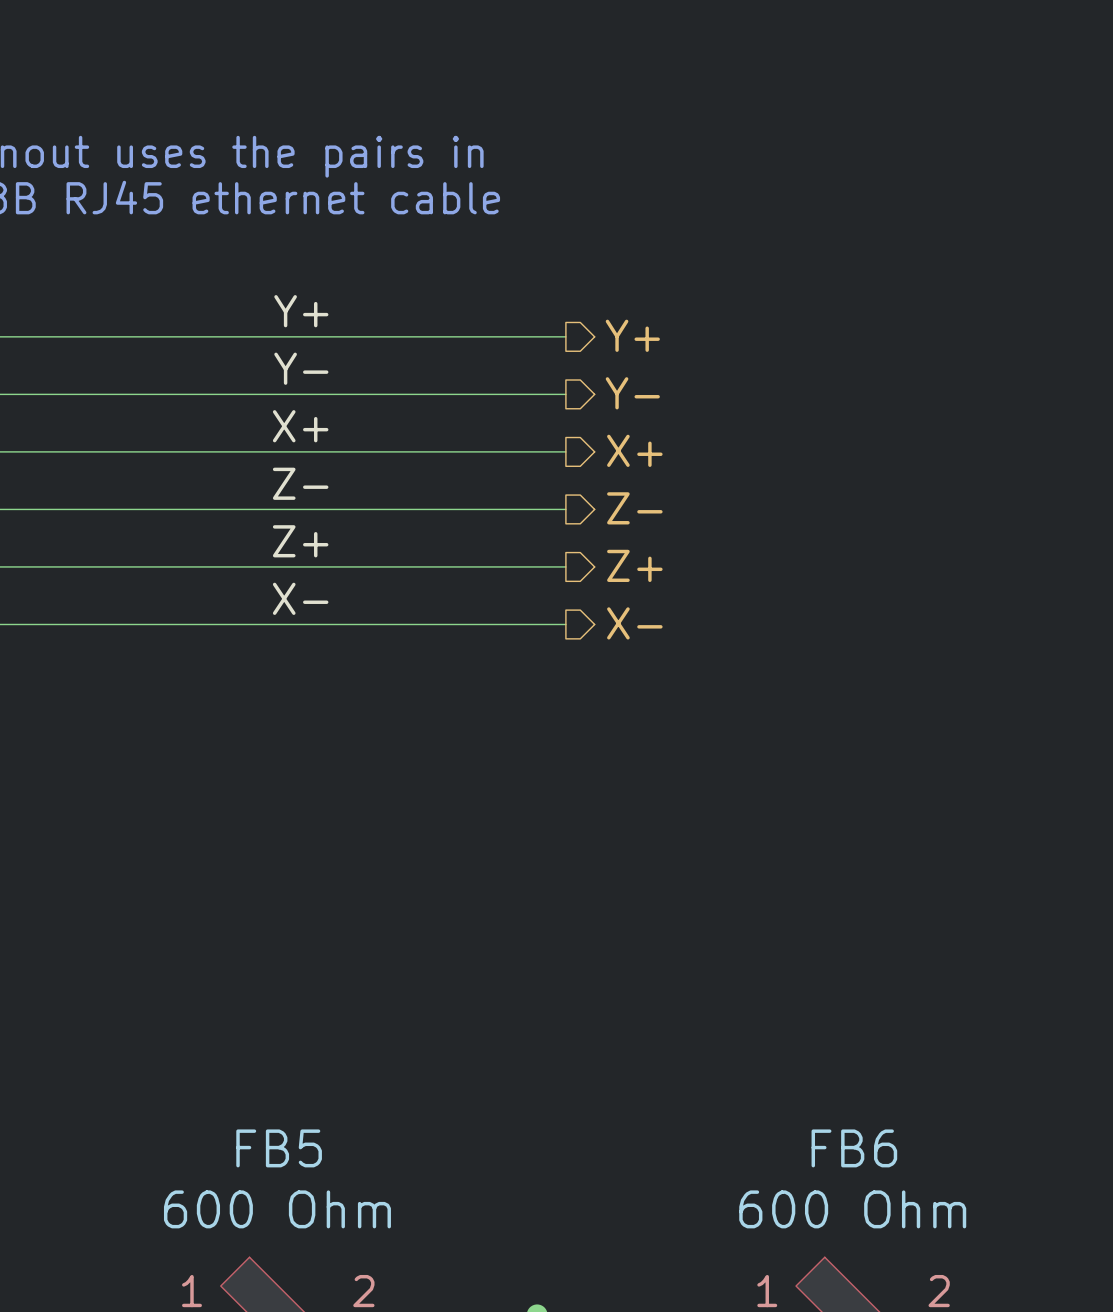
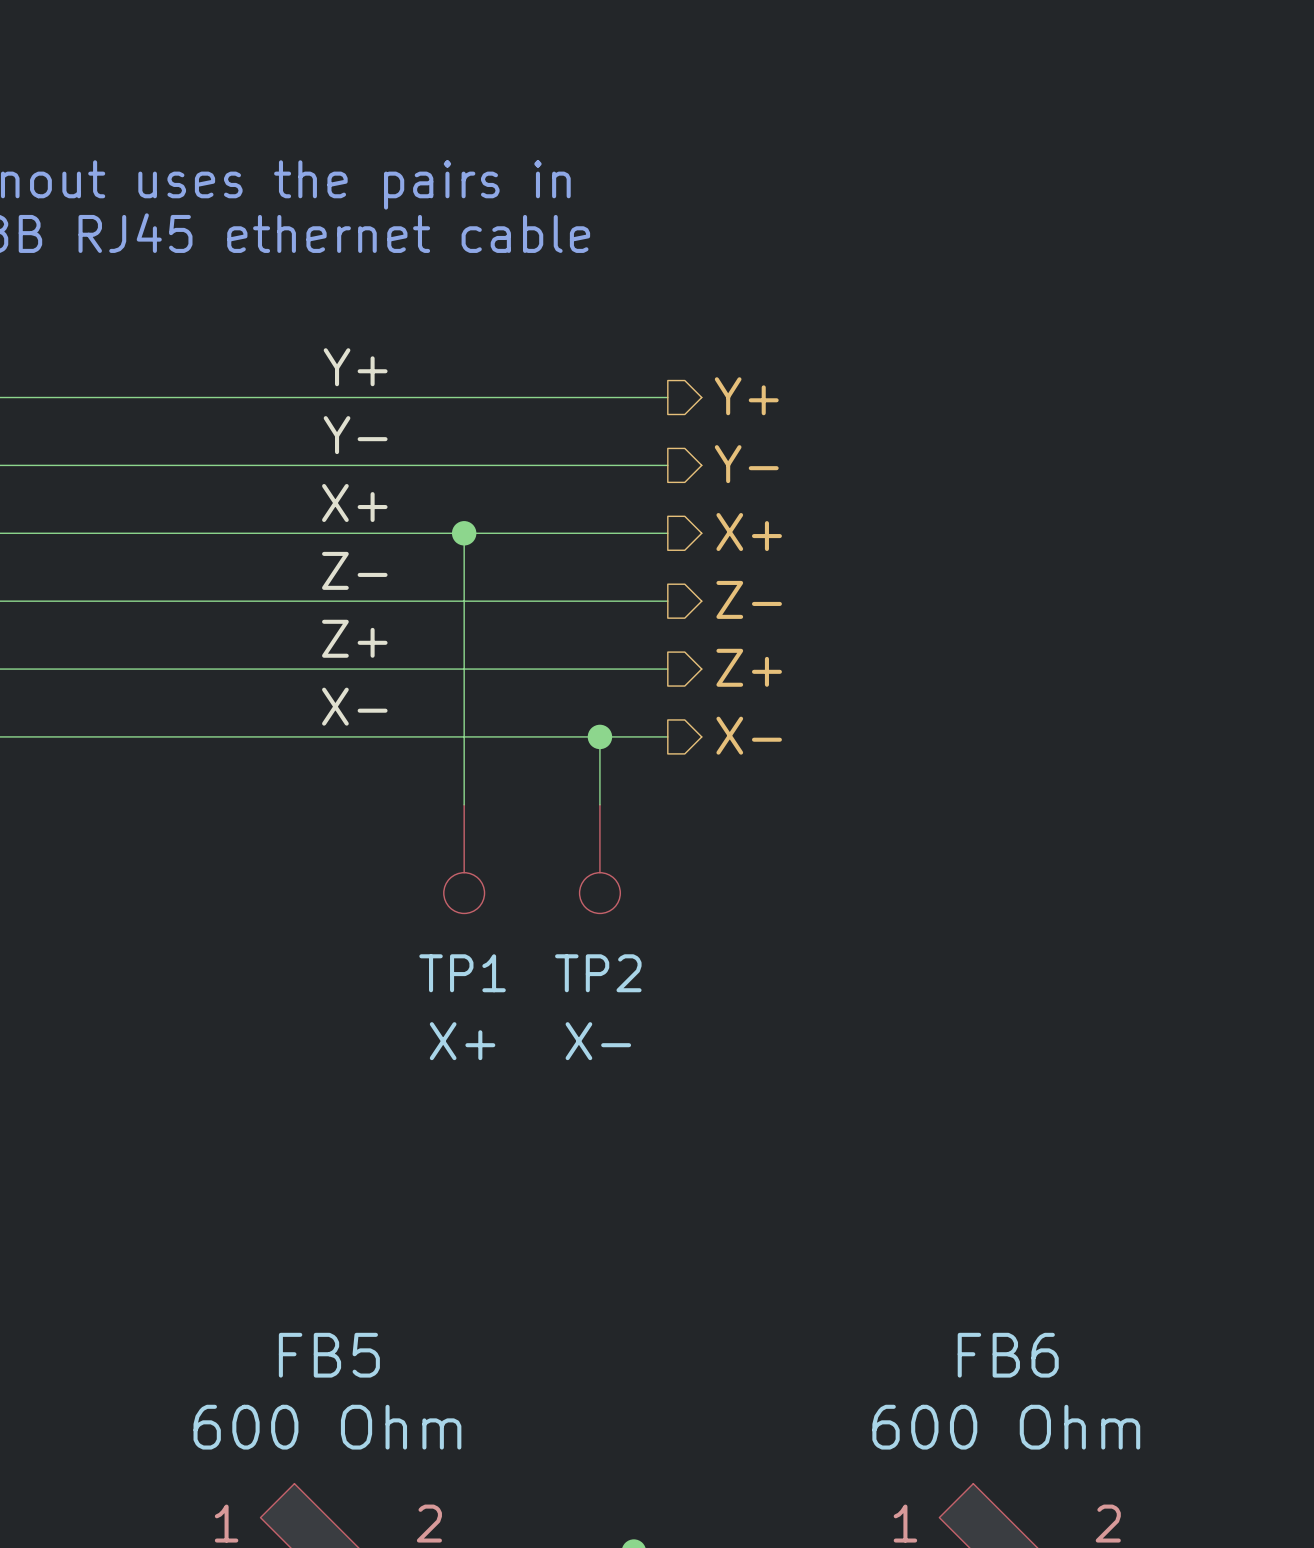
wire: none -> (464, 533) (464, 804)
junction: none -> (464, 533)
wire: none -> (599, 736) (599, 804)
junction: none -> (599, 736)
TP1: none -> X+ (464, 859)
TP2: none -> X- (599, 859)

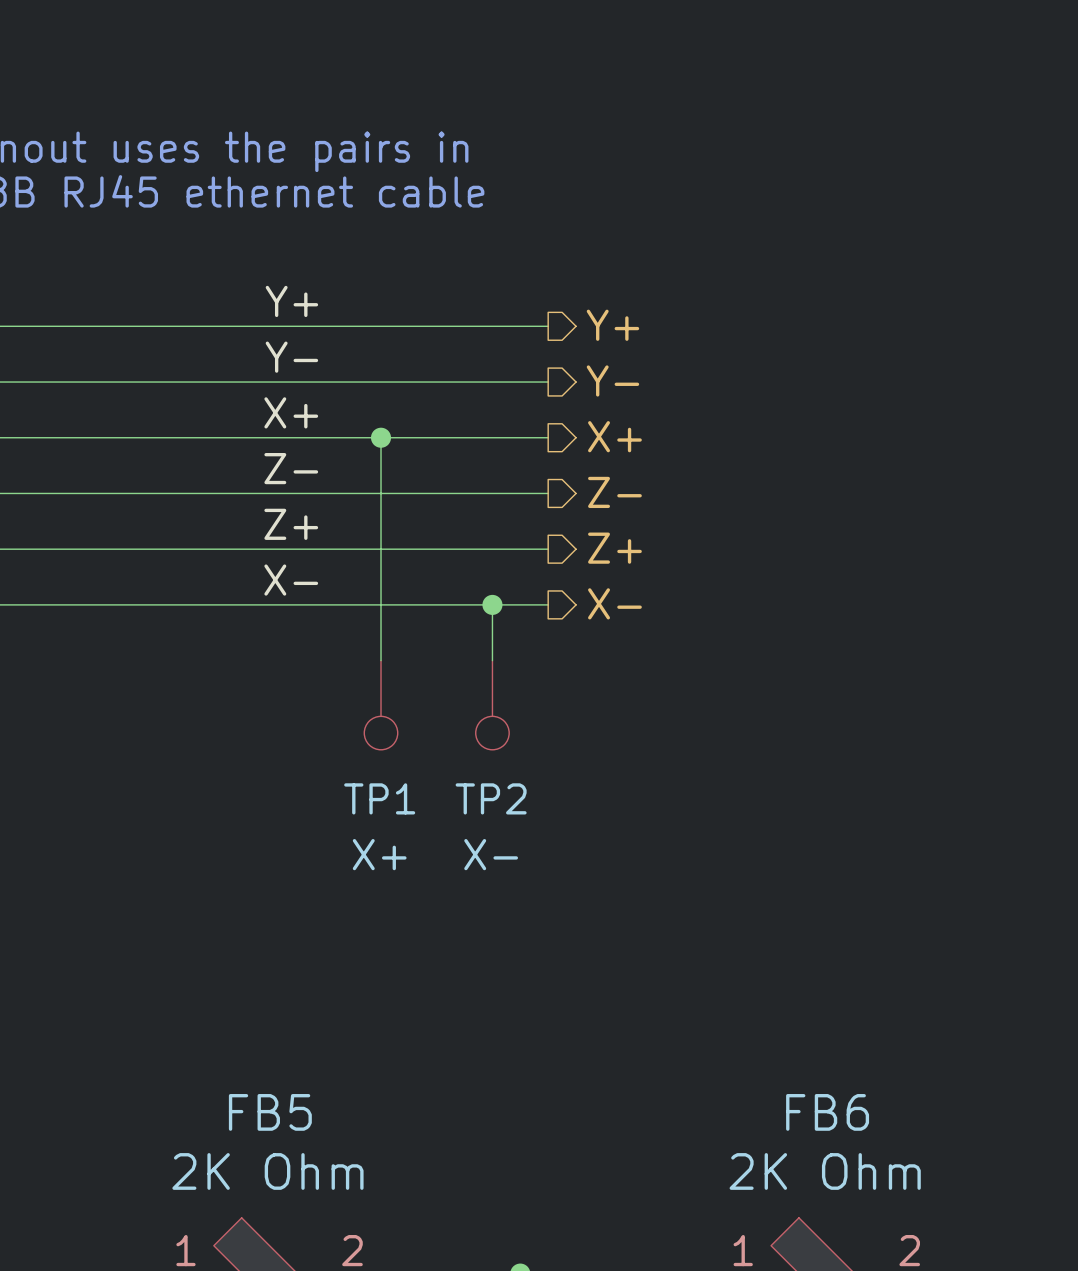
FB5 value: 600 Ohm (327, 1427) -> 2K Ohm (267, 1171)
FB6 value: 600 Ohm (1006, 1427) -> 2K Ohm (825, 1171)

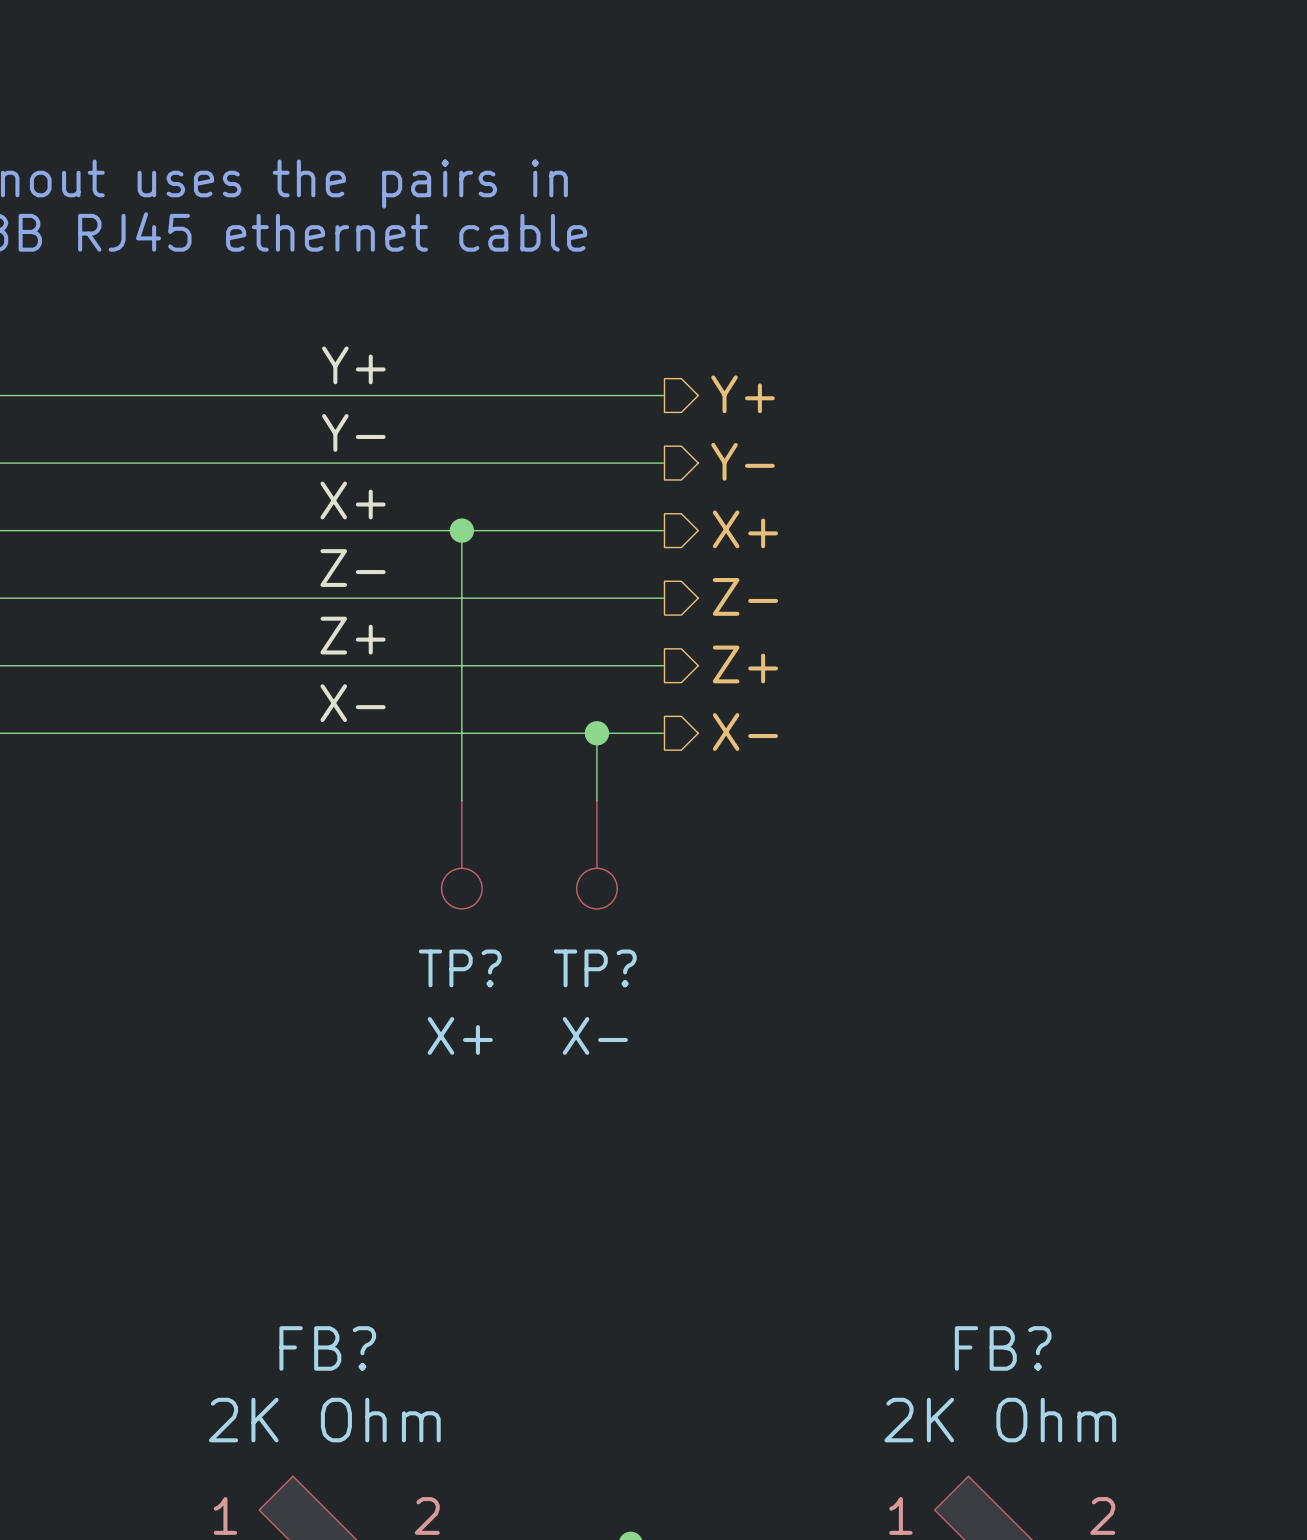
TP1 name: TP1 (379, 798) -> TP? (460, 968)
TP2 name: TP2 (491, 798) -> TP? (595, 968)
FB5 name: FB5 (270, 1112) -> FB? (327, 1348)
FB6 name: FB6 (827, 1112) -> FB? (1003, 1348)

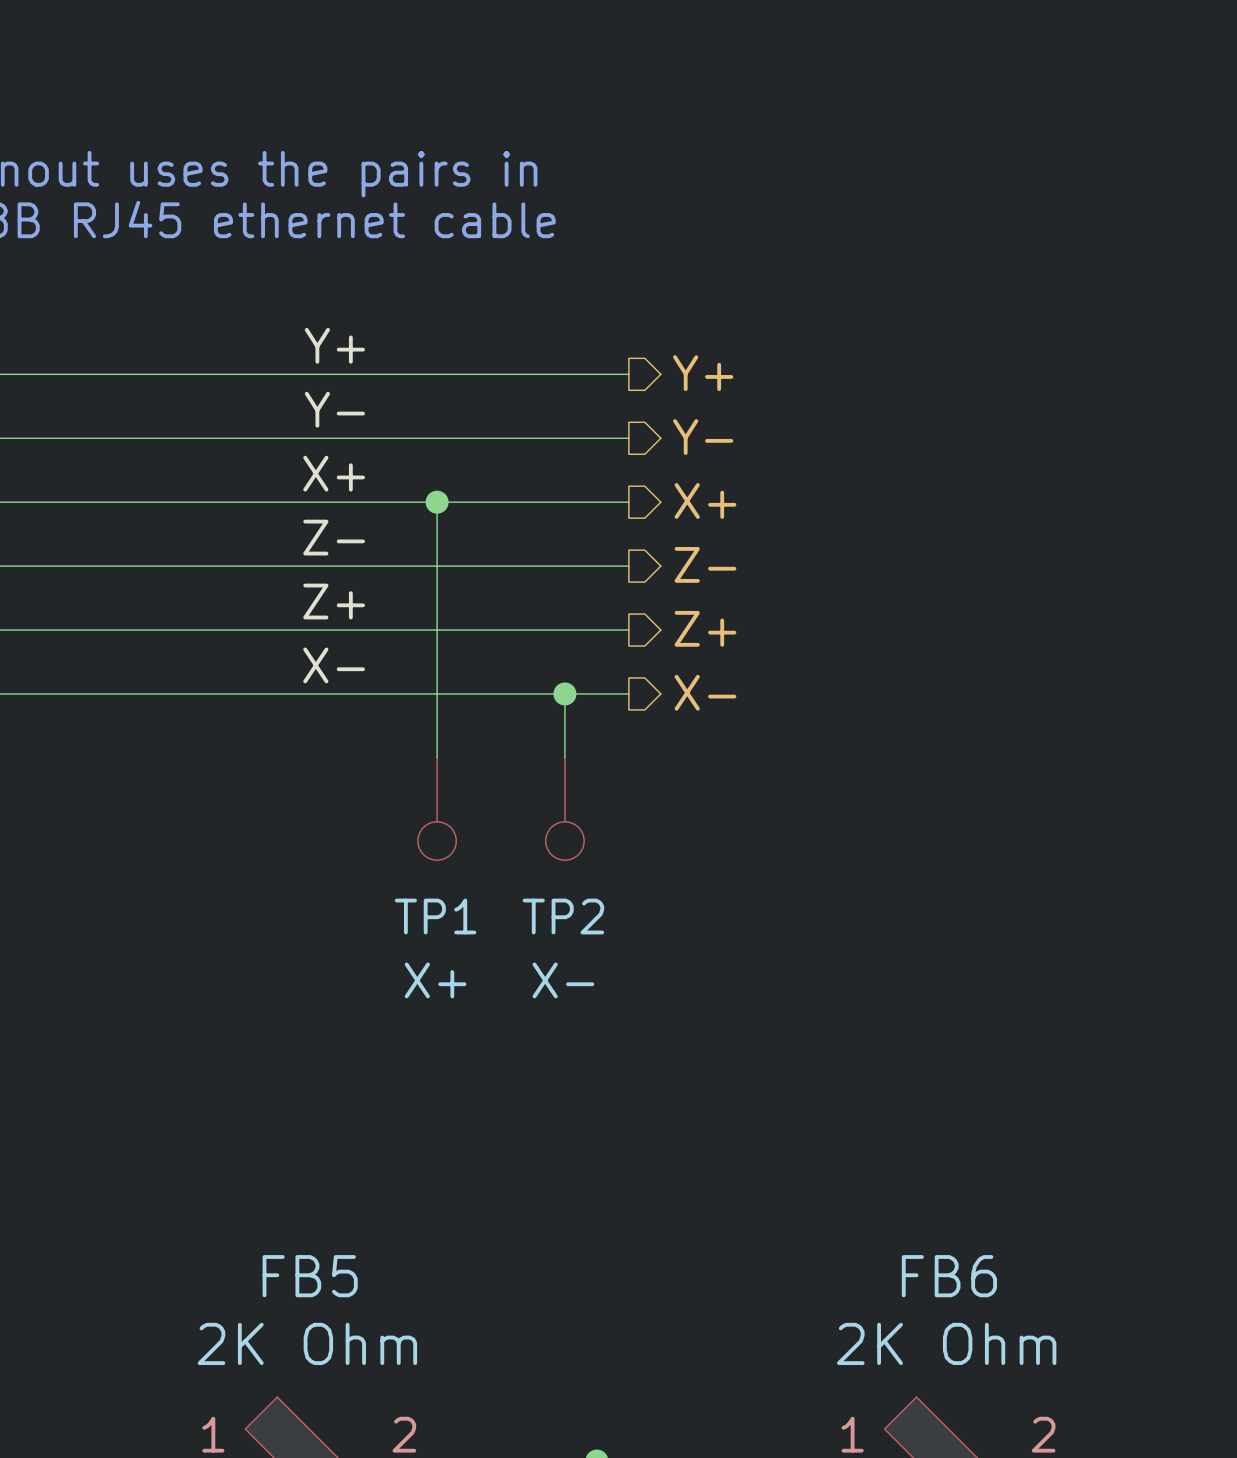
TP? name: TP? (460, 968) -> TP1 (435, 916)
TP? name: TP? (595, 968) -> TP2 (563, 916)
FB? name: FB? (327, 1348) -> FB5 (310, 1276)
FB? name: FB? (1003, 1348) -> FB6 (949, 1276)

